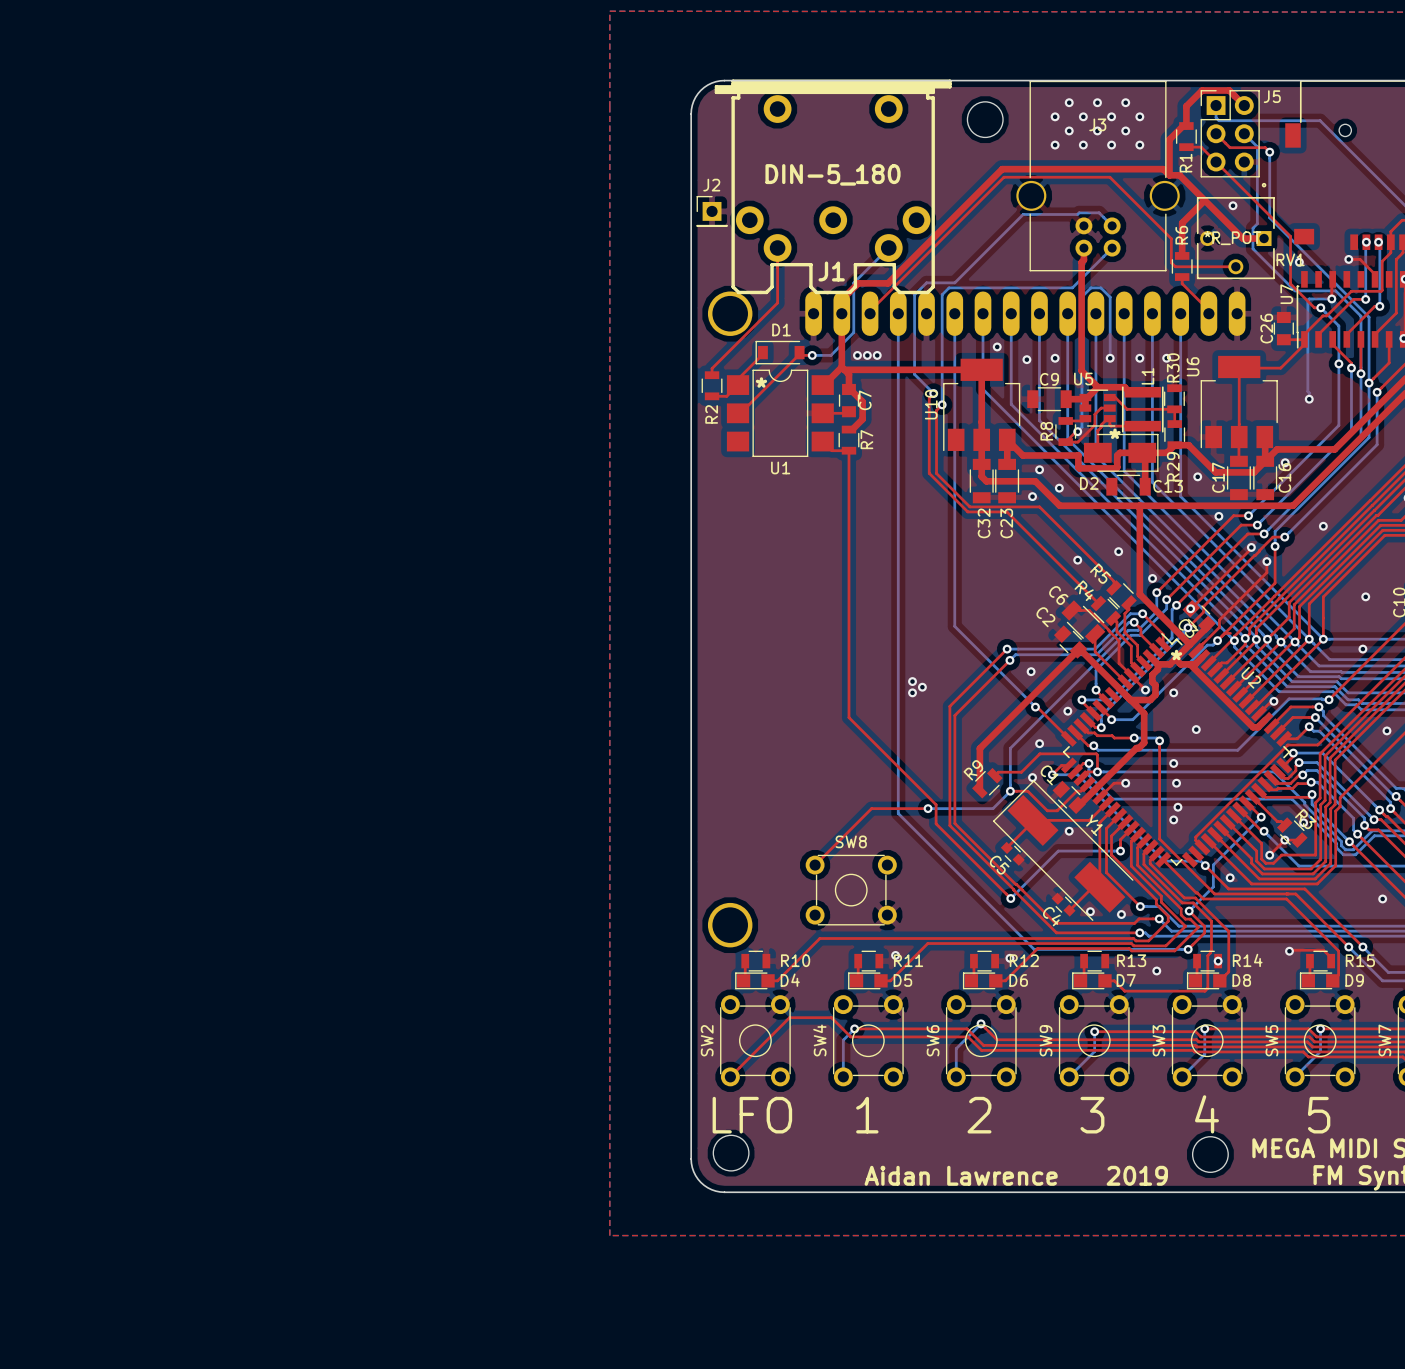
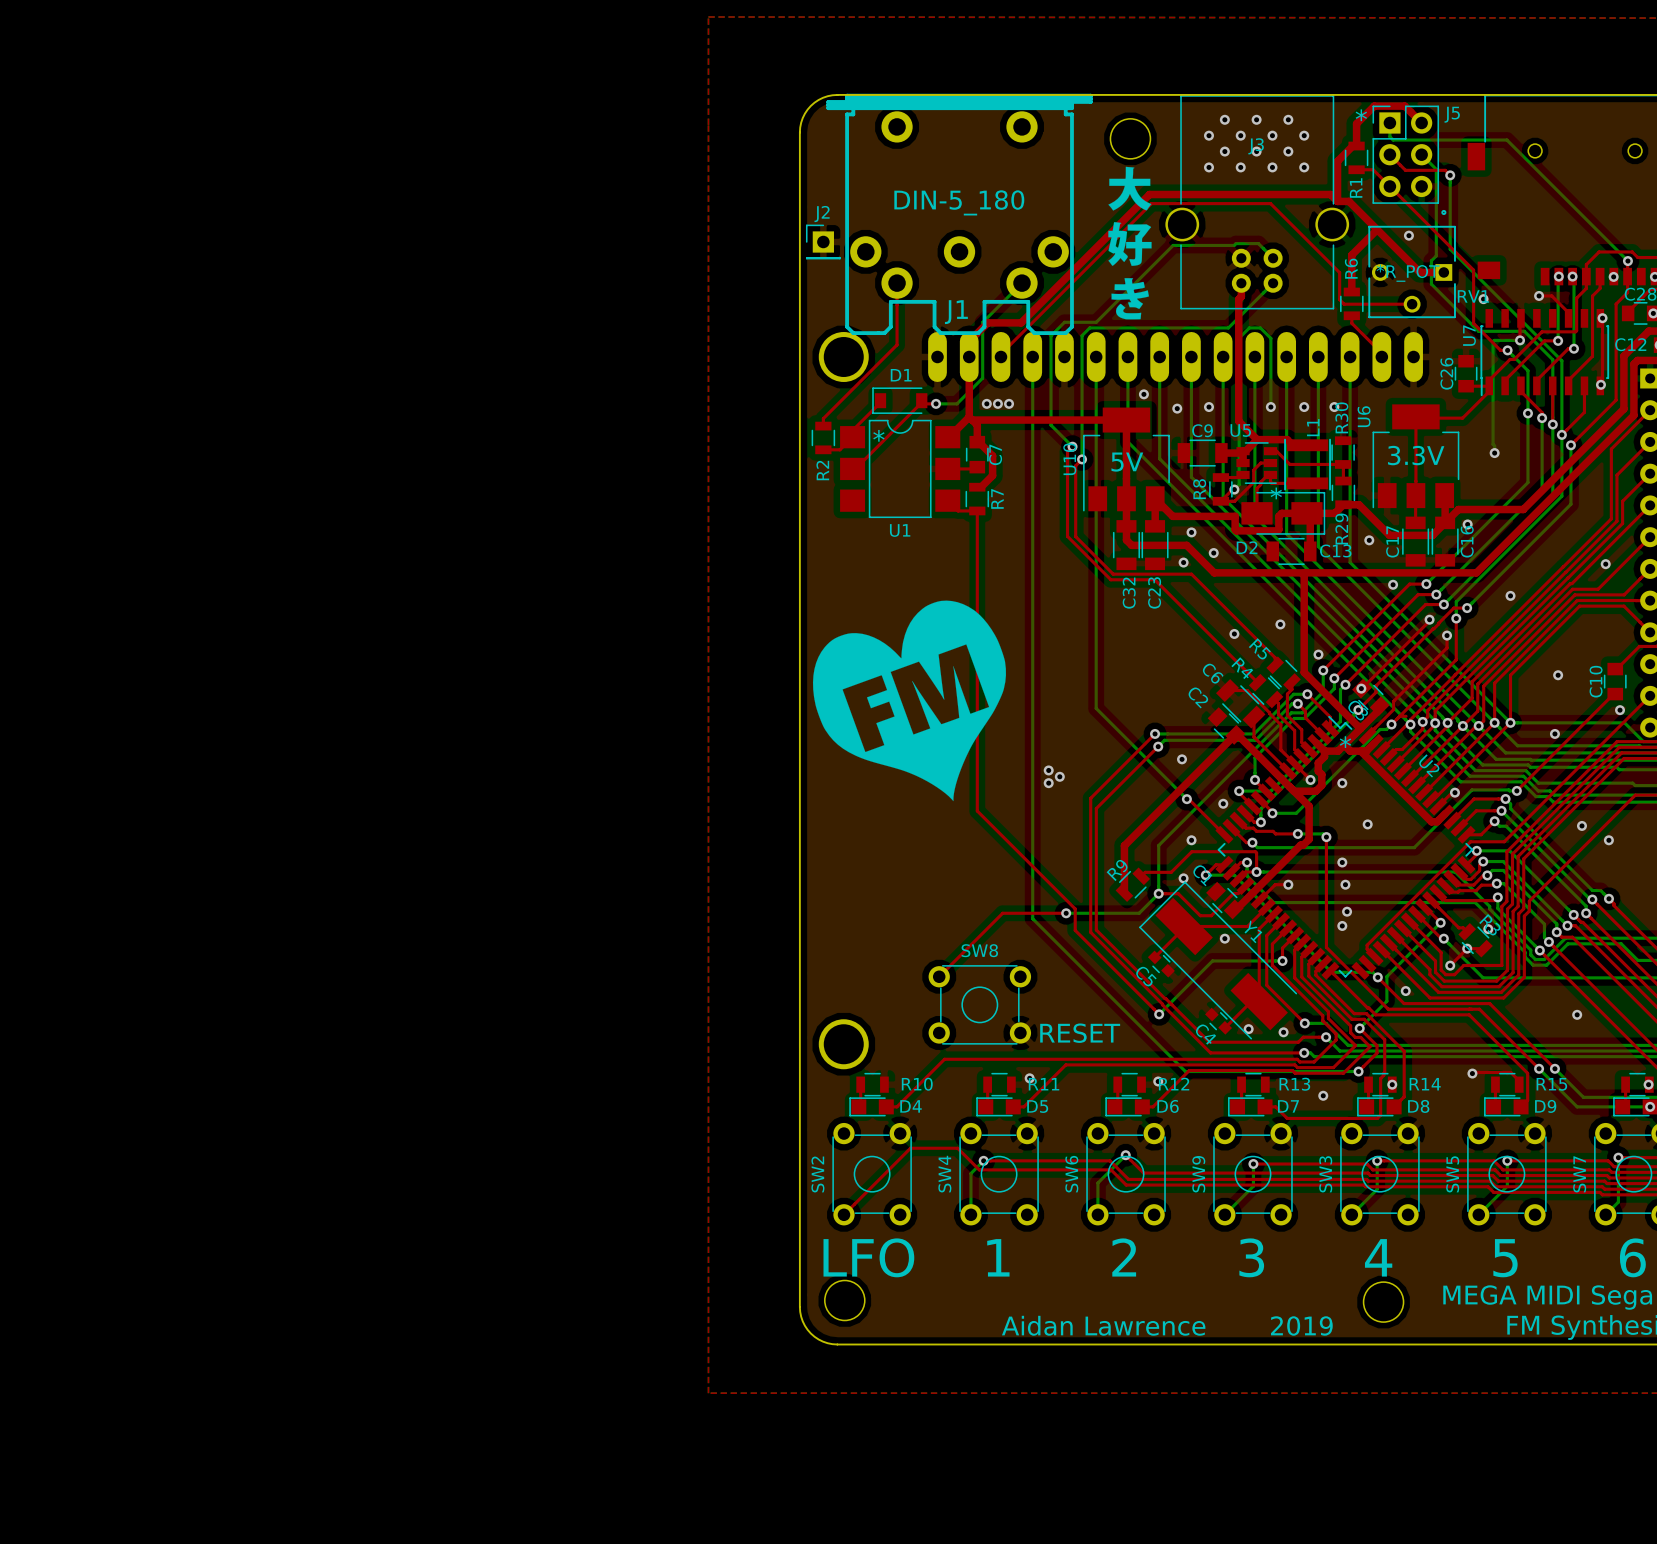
text: none -> * (1361, 115)
drawing: none -> [1108, 166, 1152, 320]
text: none -> 3.3V (1416, 455)
text: none -> 5V (1127, 462)
drawing: none -> [812, 600, 1007, 802]
text: none -> RESET (1080, 1033)

